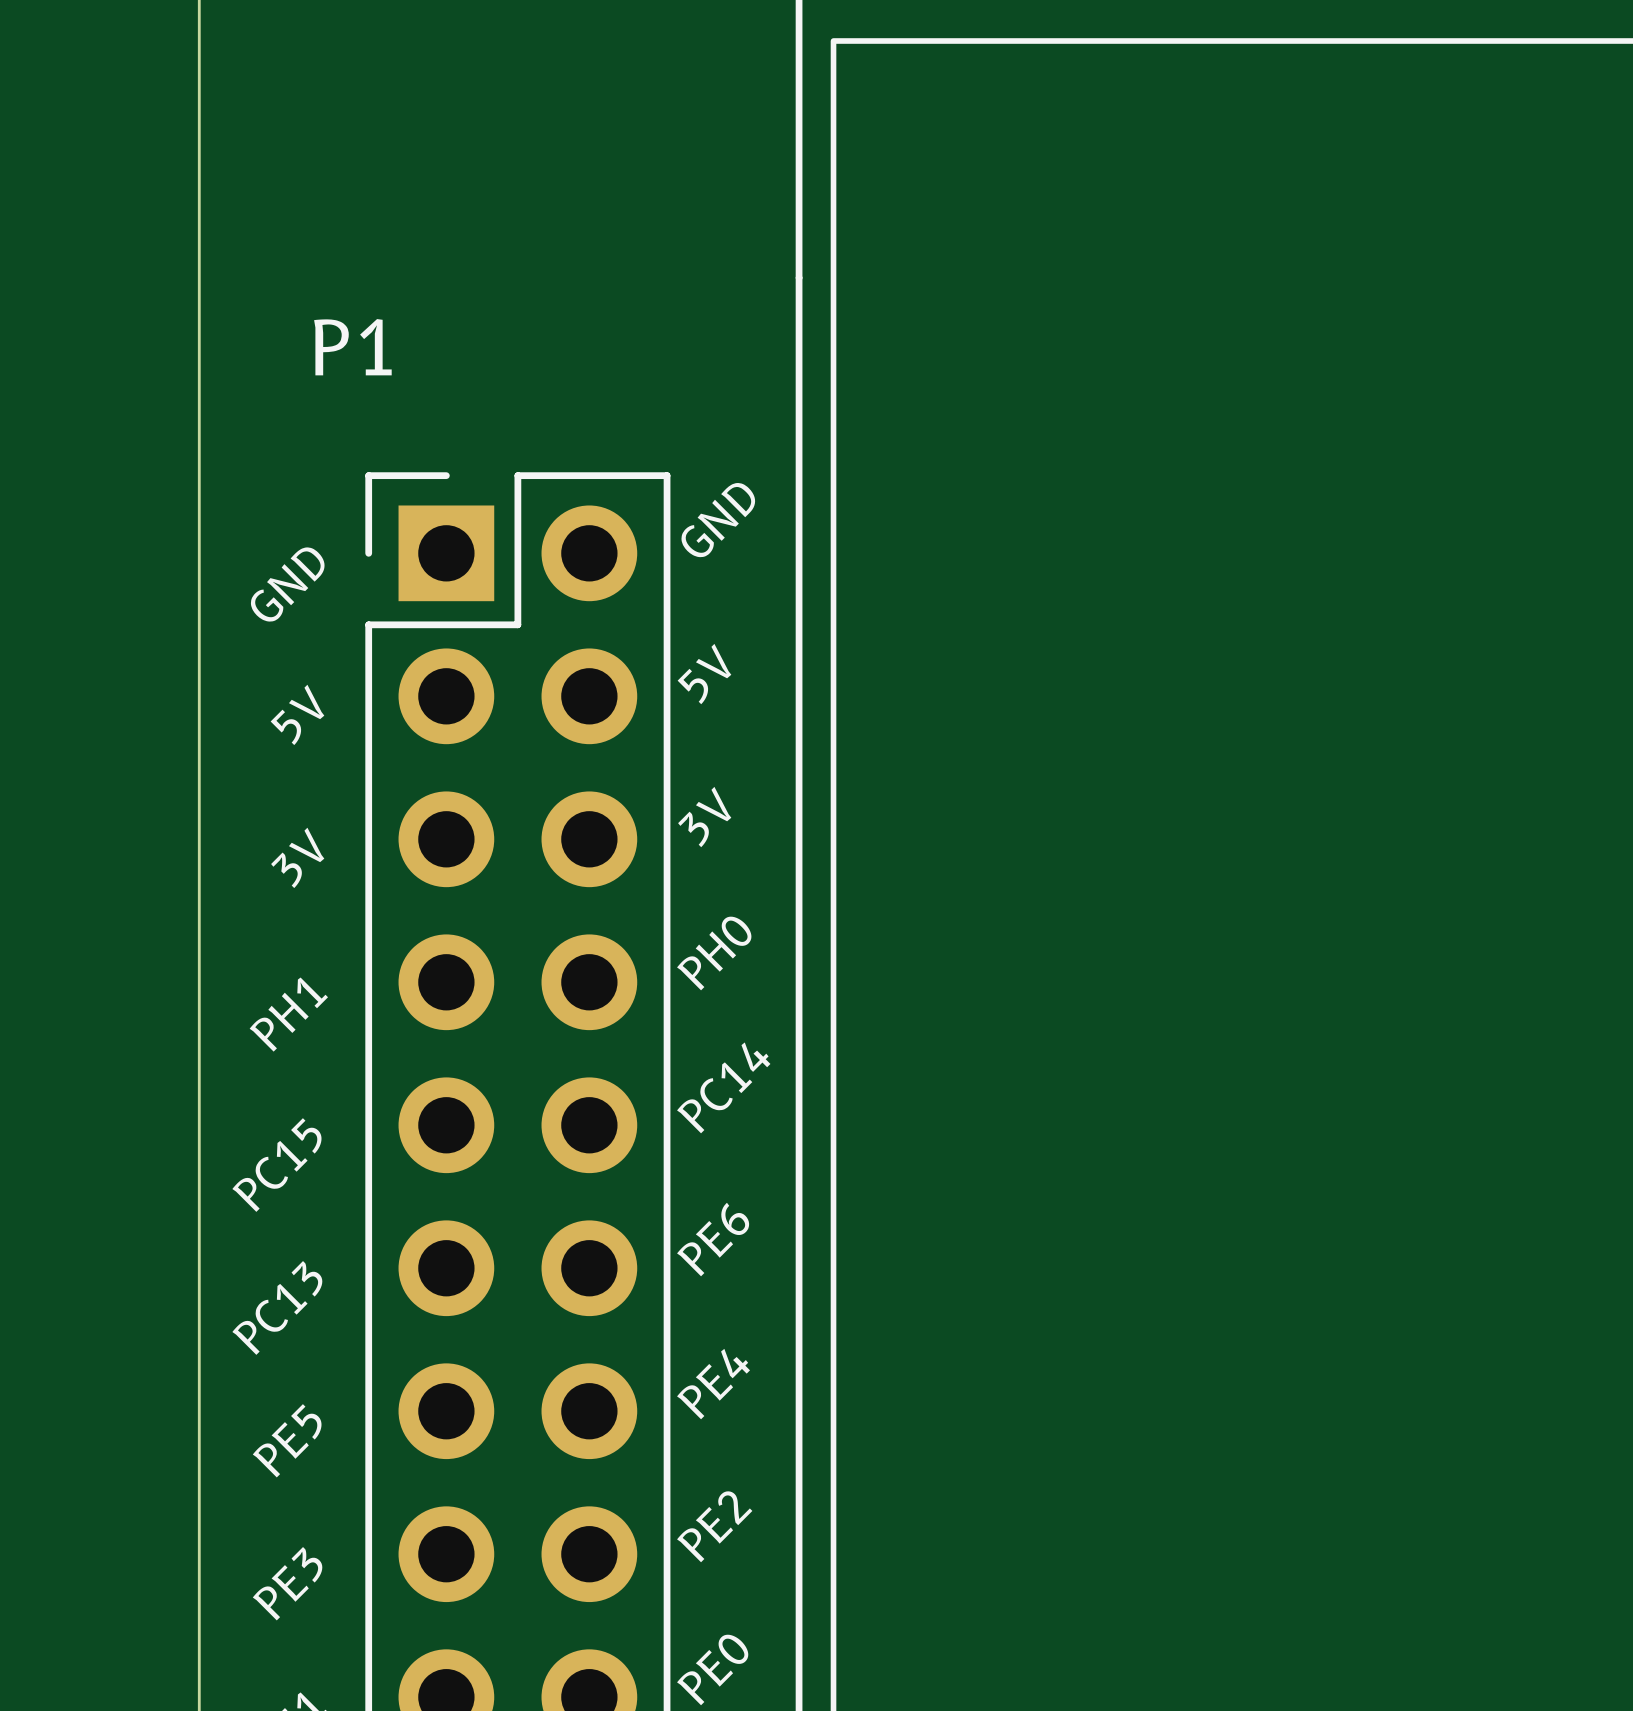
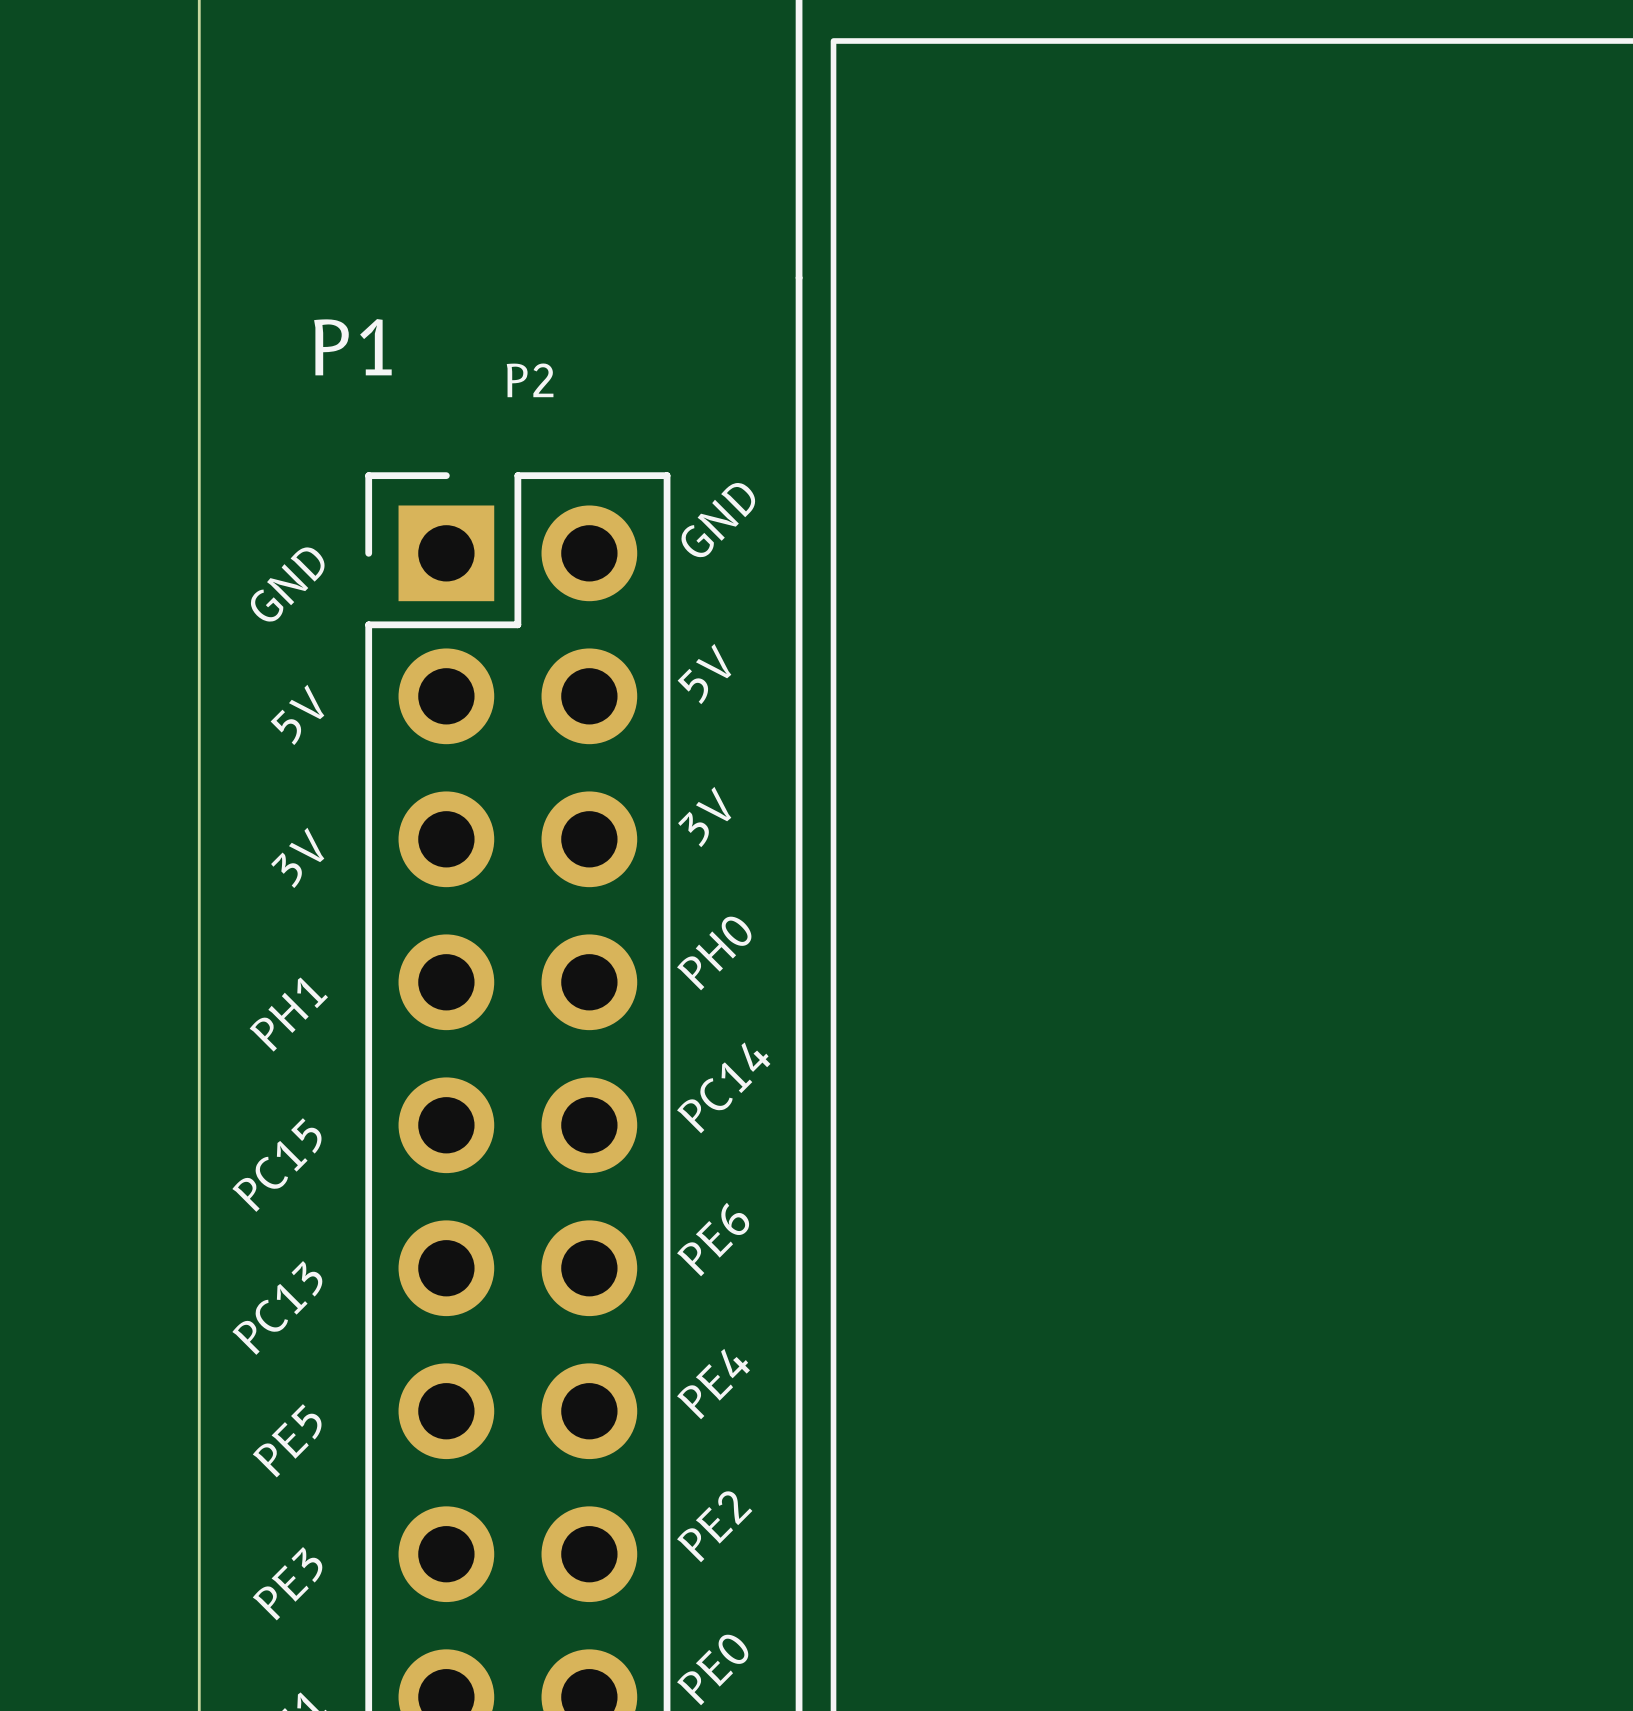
text: none -> P2 (530, 380)

